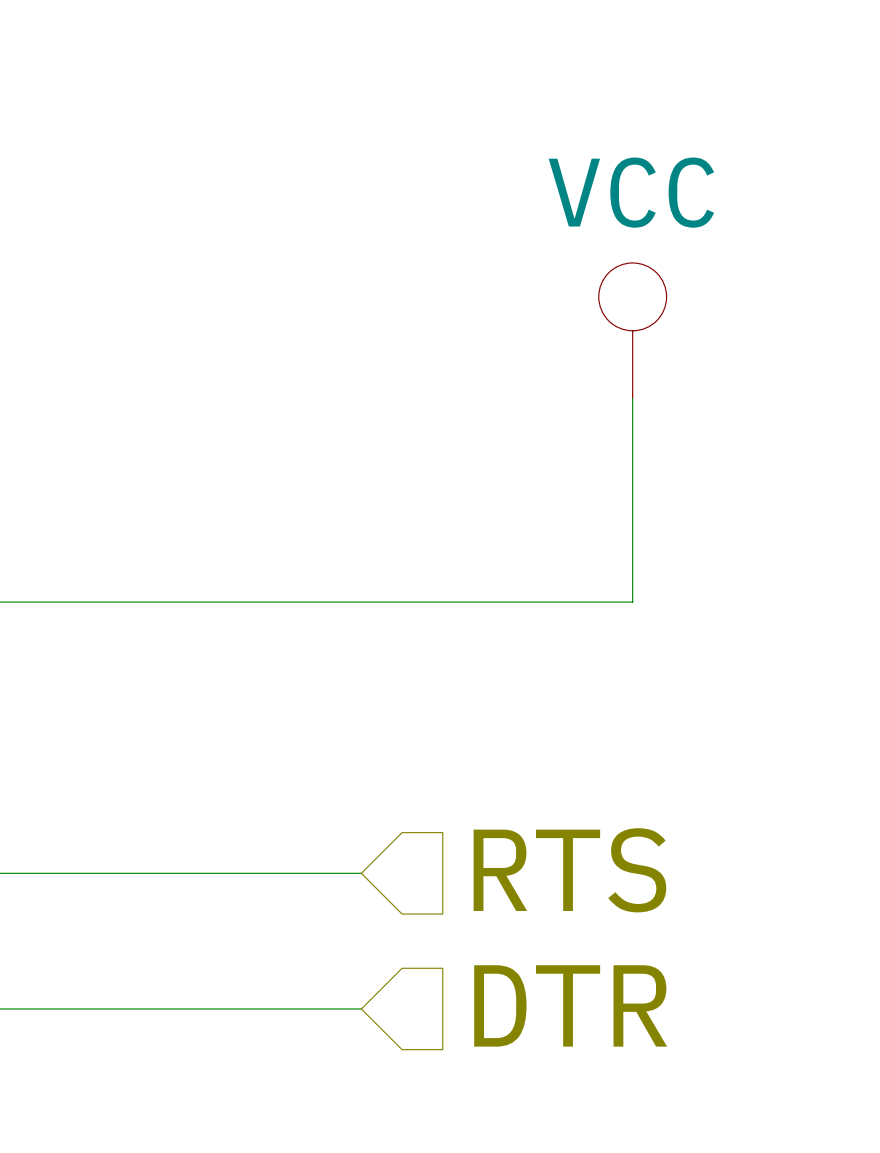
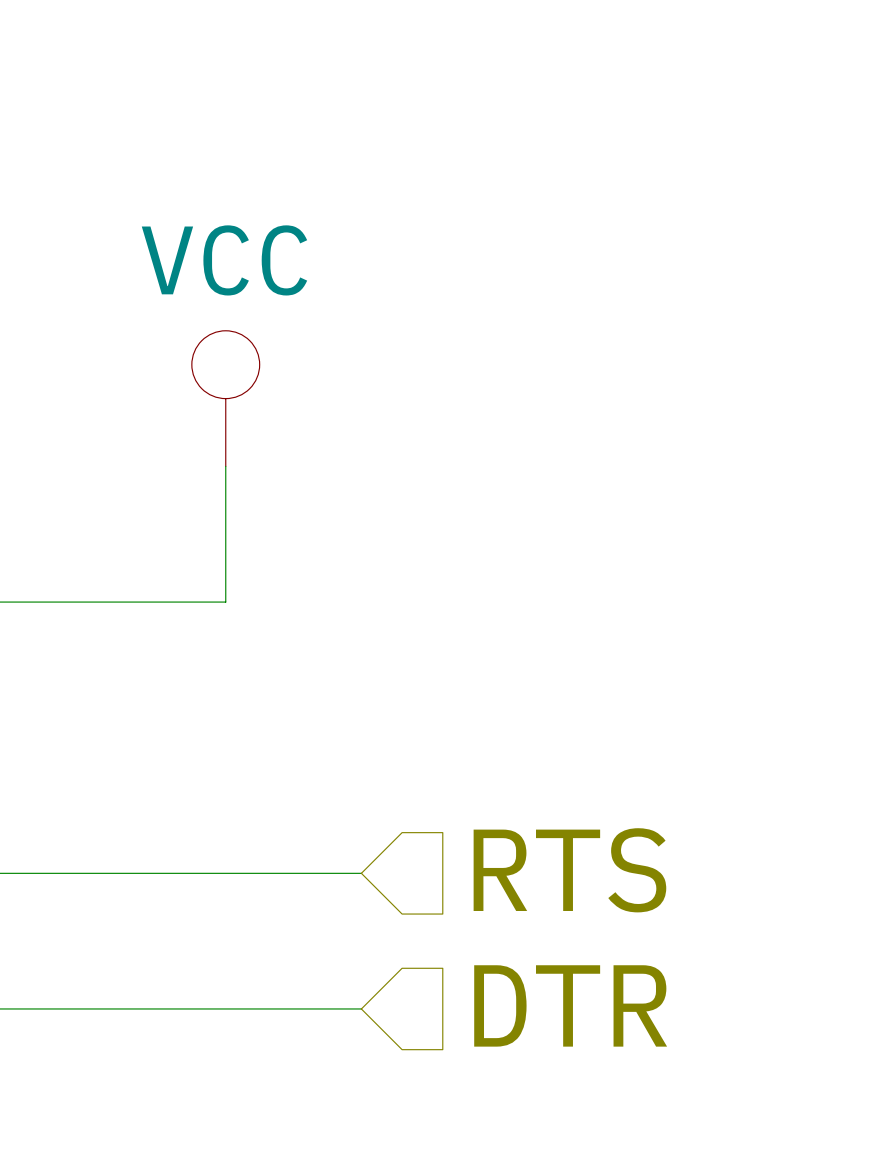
power symbol position: VCC (632, 330) -> VCC (225, 398)
wire: (632, 398) (632, 602) (225, 602) -> (225, 466) (225, 602)

